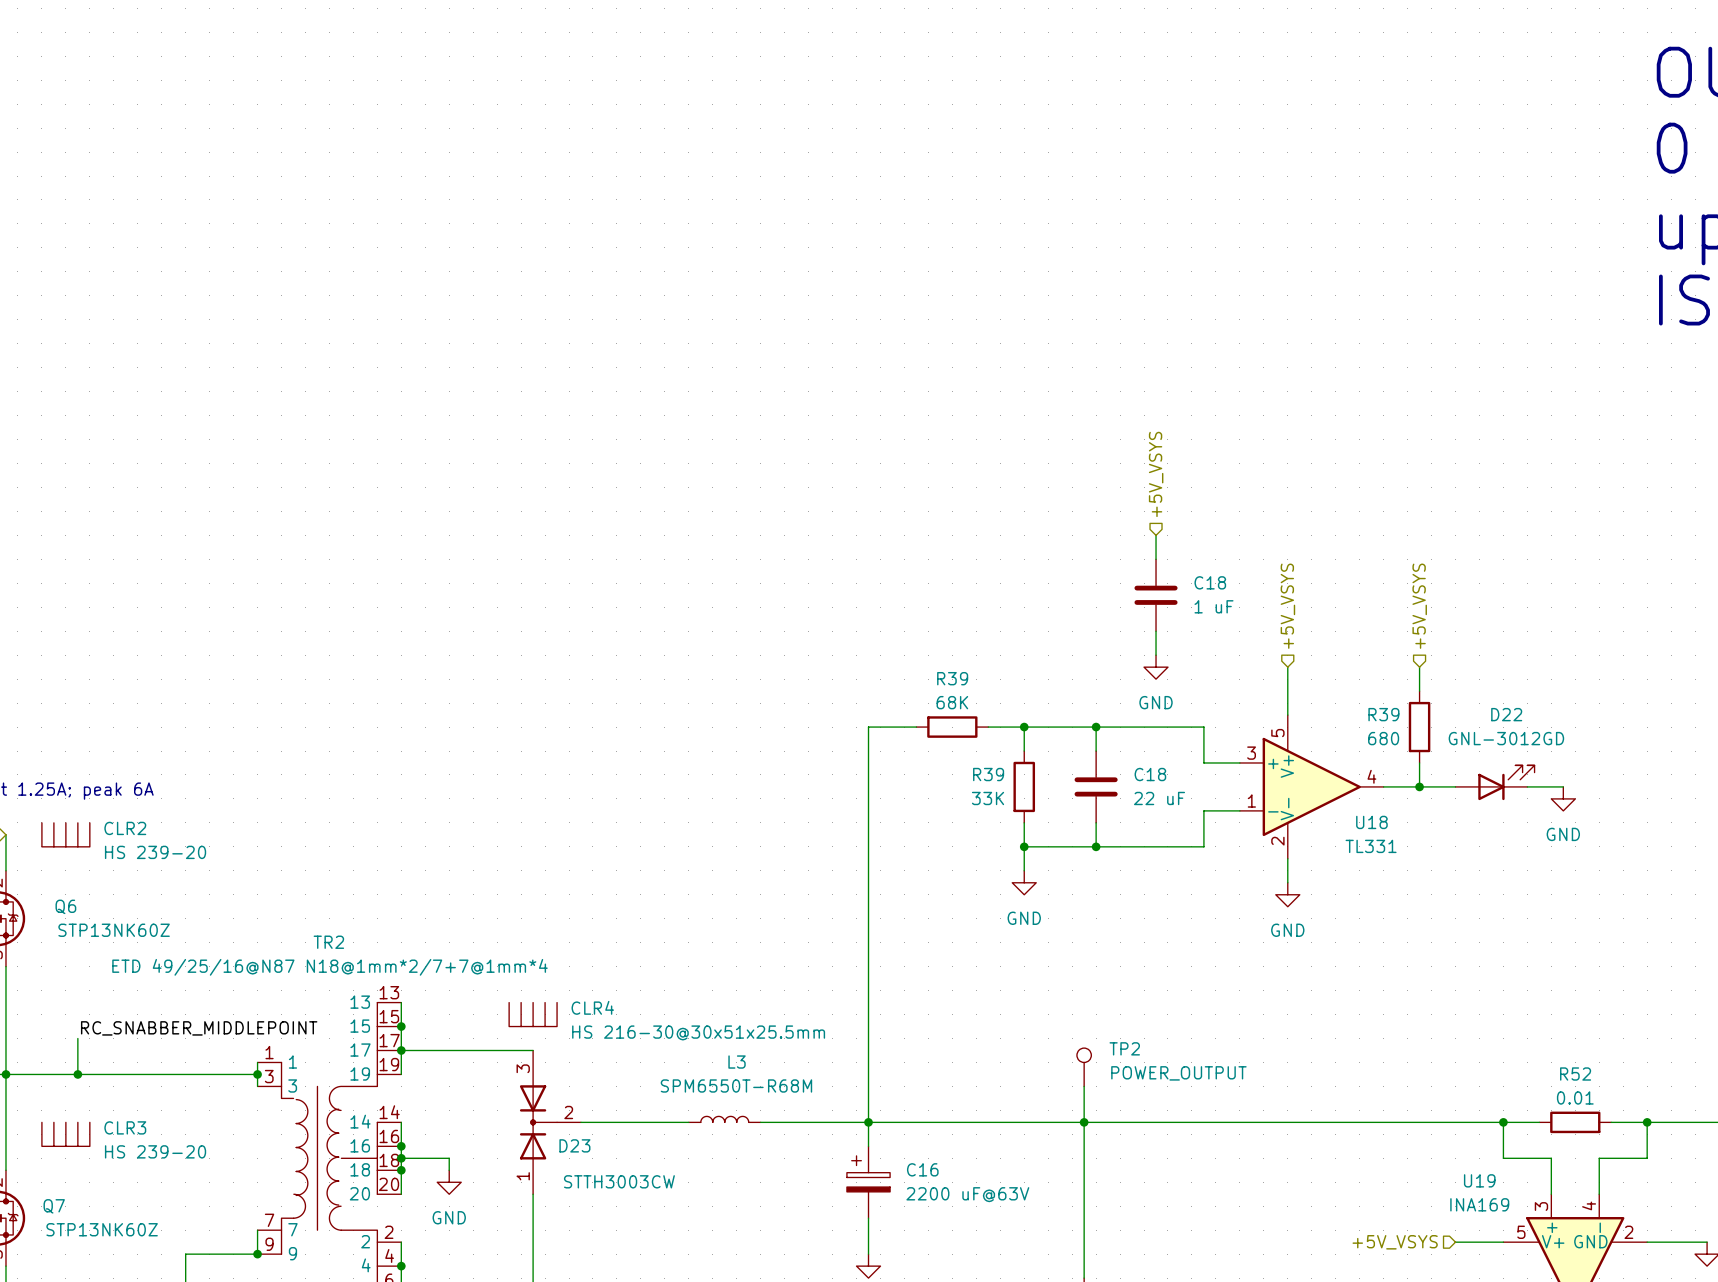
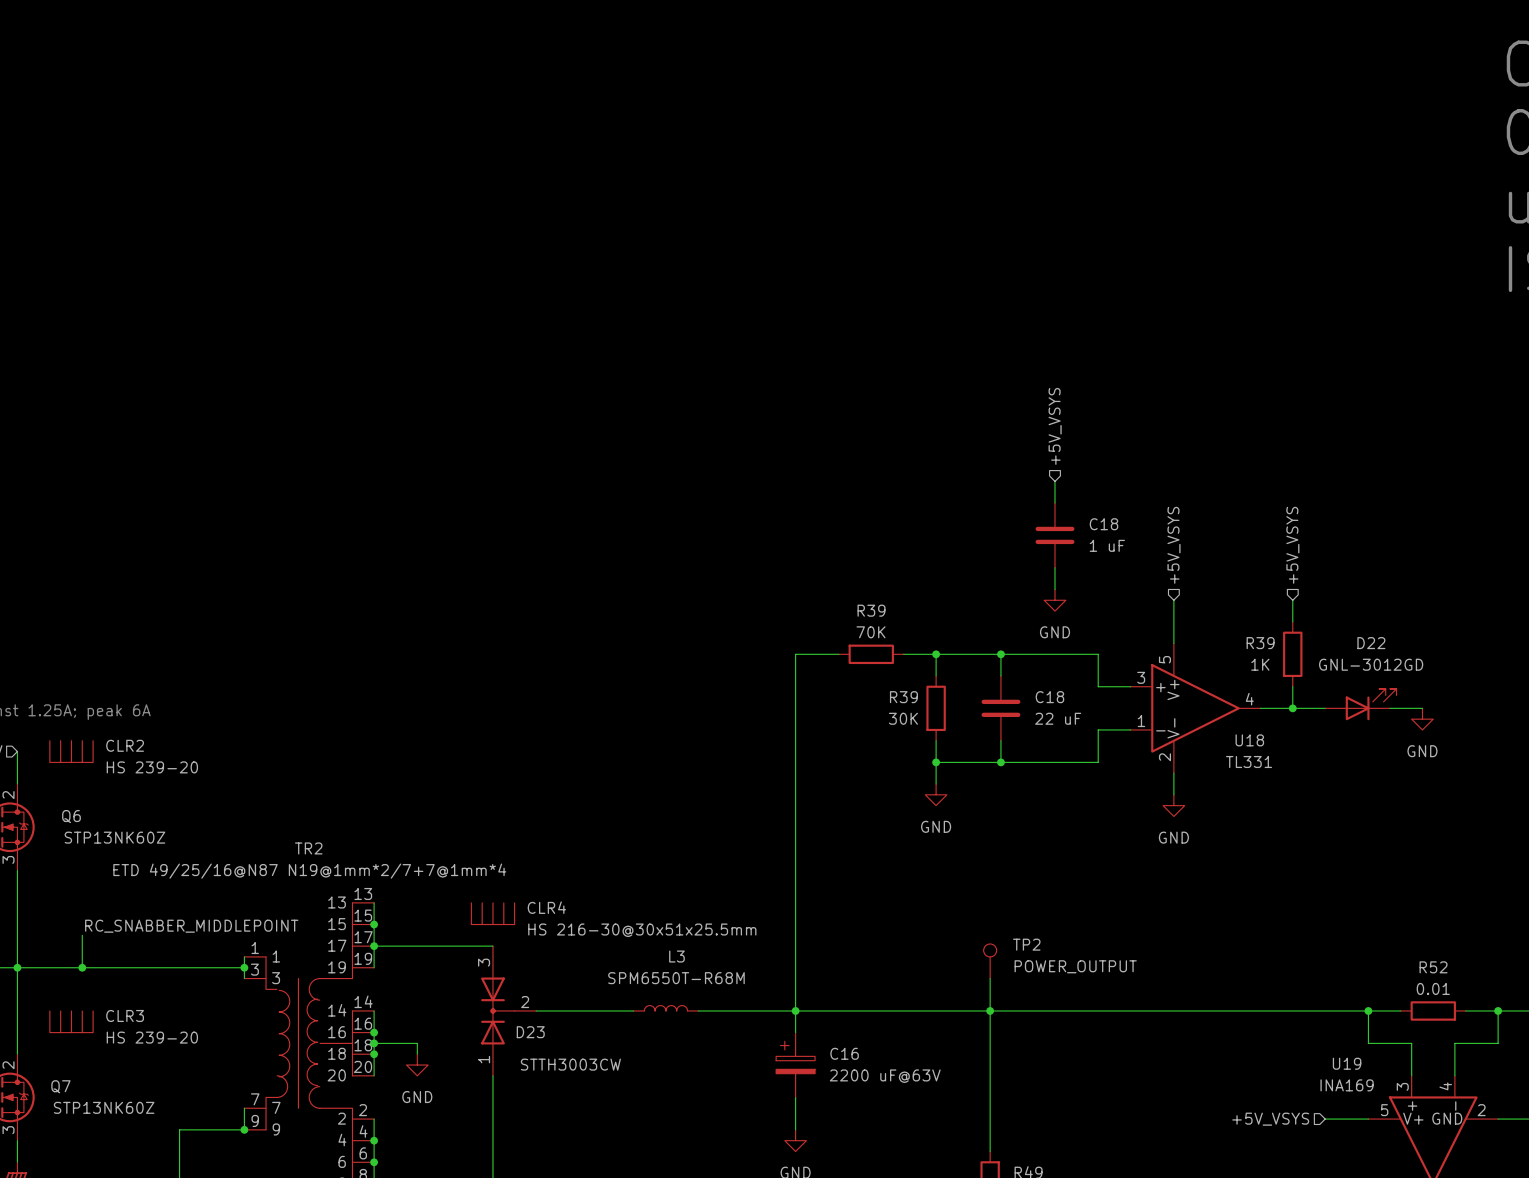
R39 value: 68K (952, 702) -> 70K (871, 632)
R39 value: 680 (1383, 738) -> 1K (1260, 664)
R39 value: 33K (988, 798) -> 30K (903, 718)
TR2 value: ETD 49/25/16@N87 N18@1mm*2/7+7@1mm*4 (330, 967) -> ETD 49/25/16@N87 N19@1mm*2/7+7@1mm*4 (309, 871)

